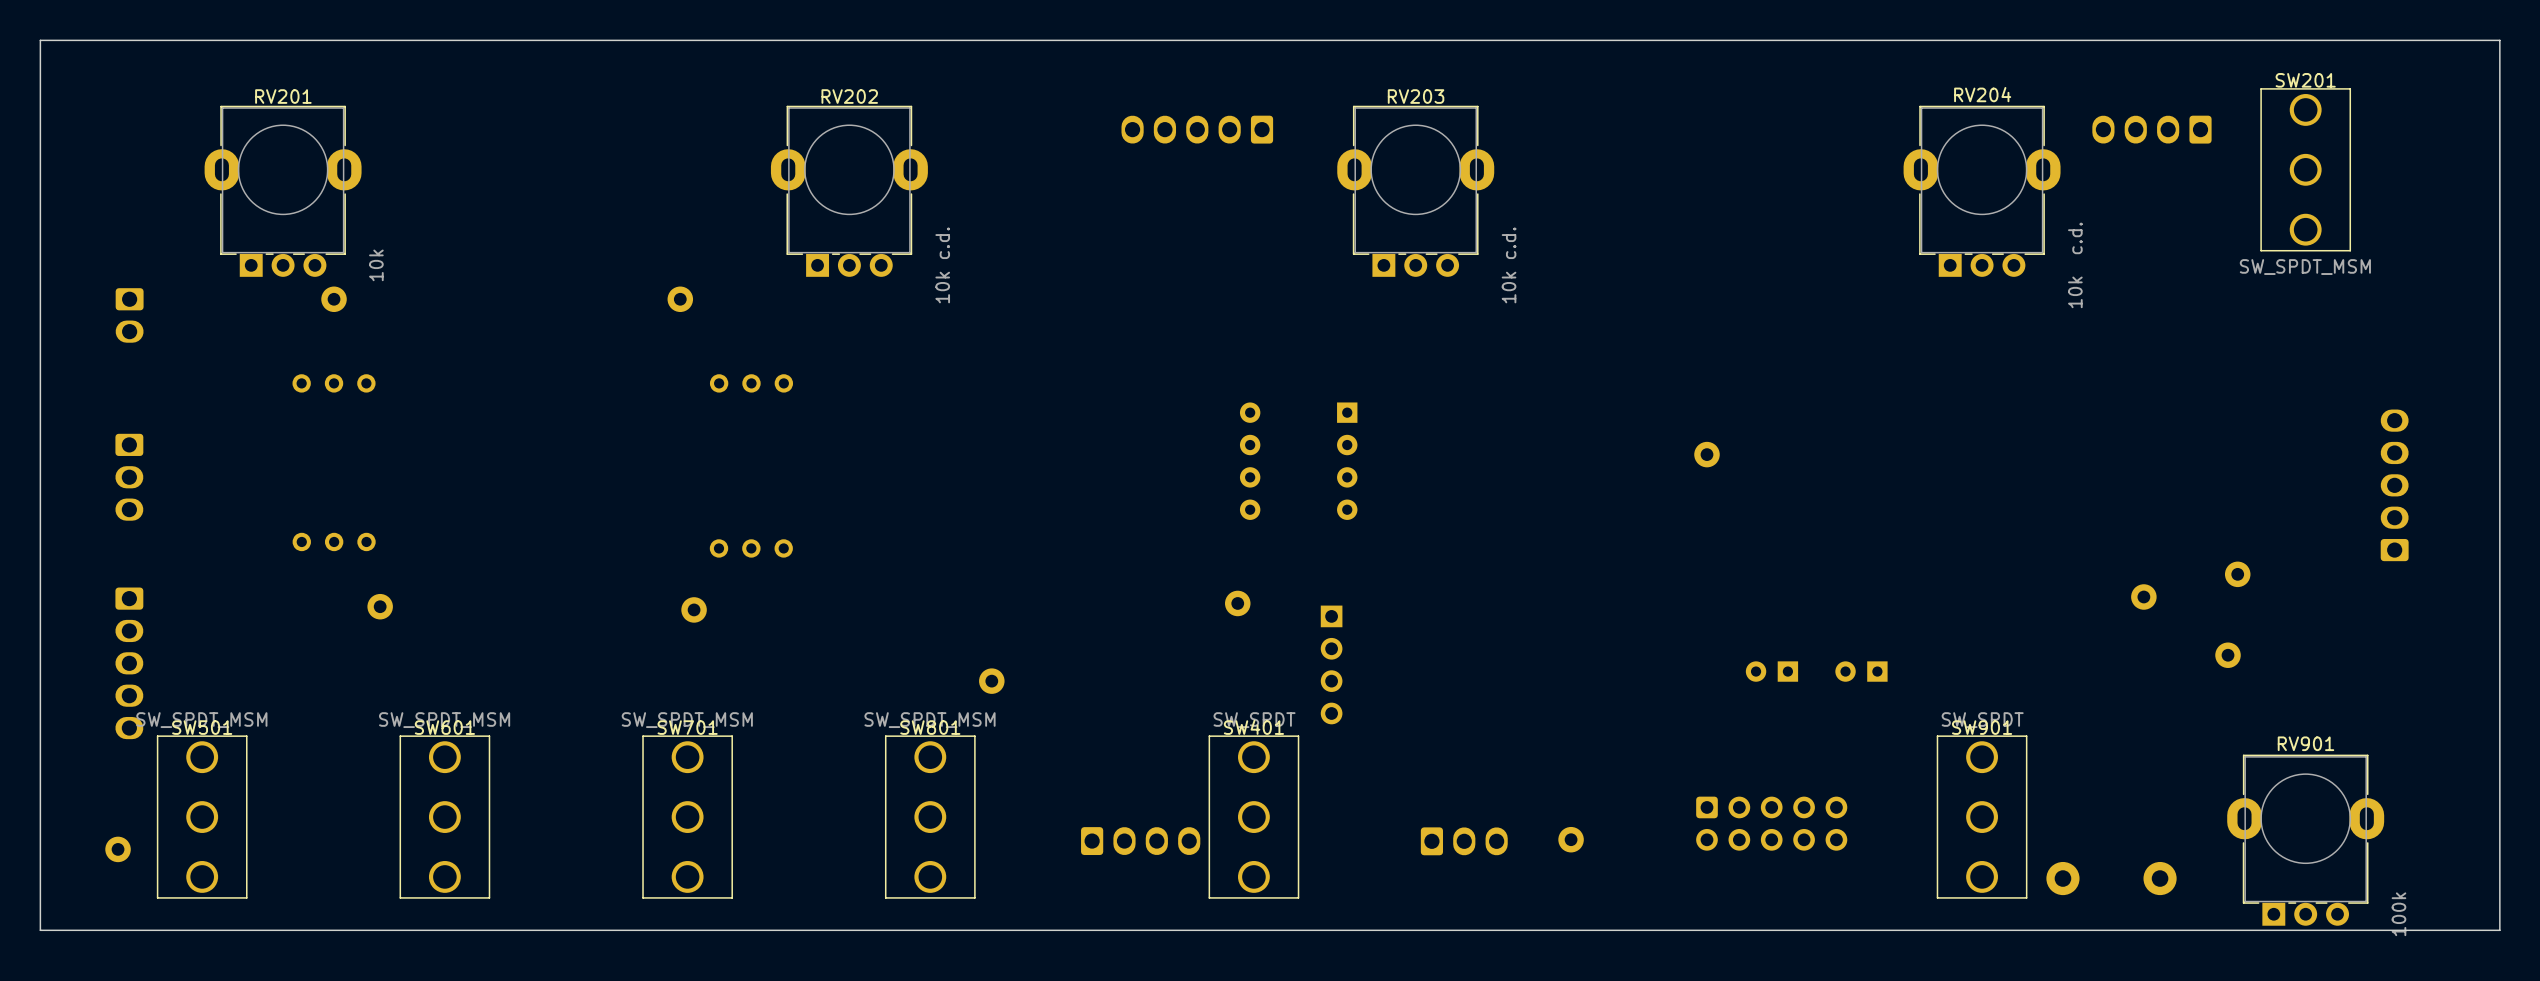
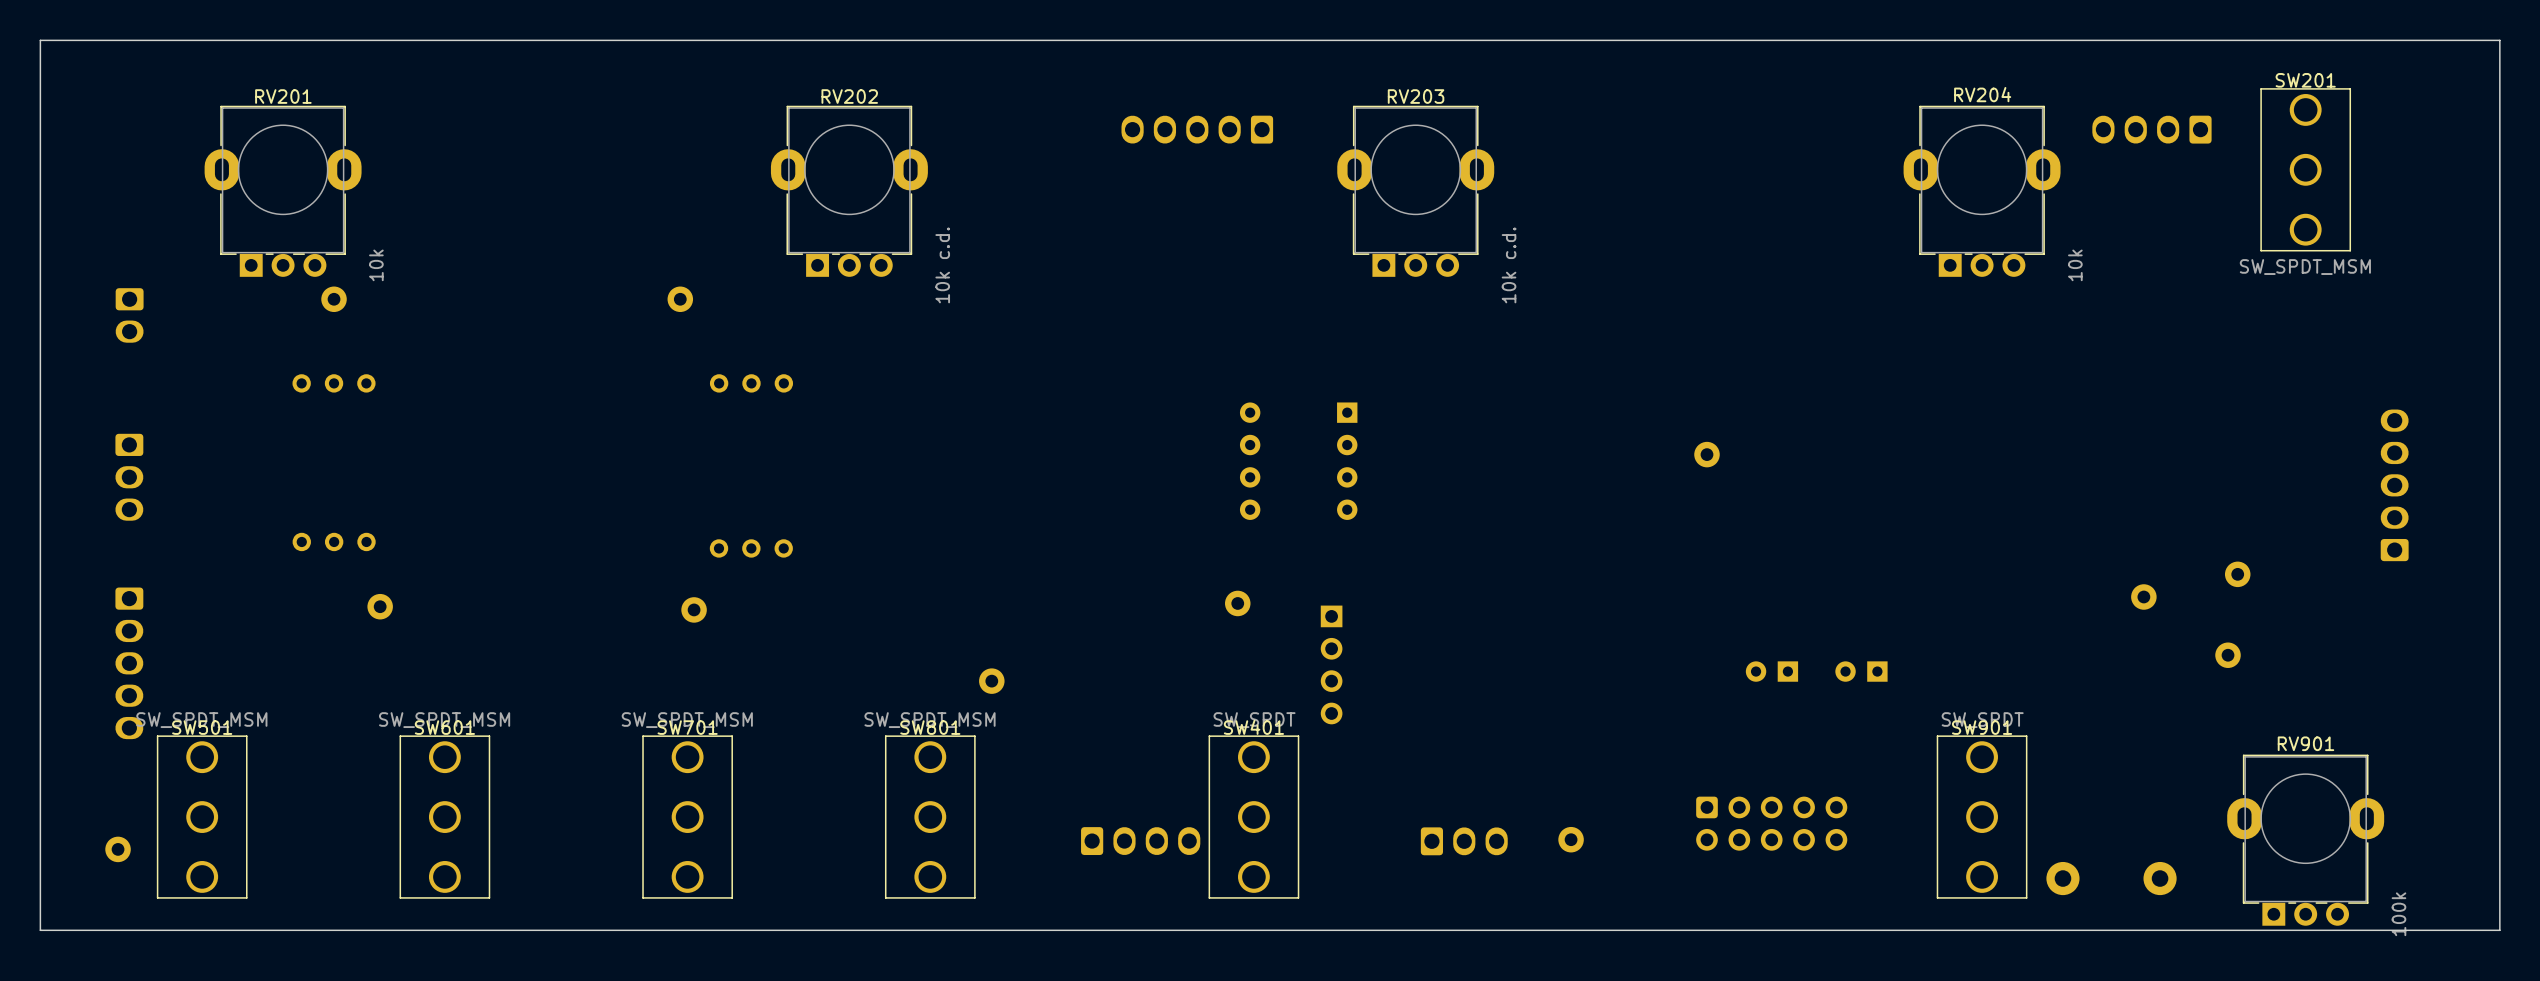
RV204 value: 10k c.d. (2075, 265) -> 10k (2075, 265)

